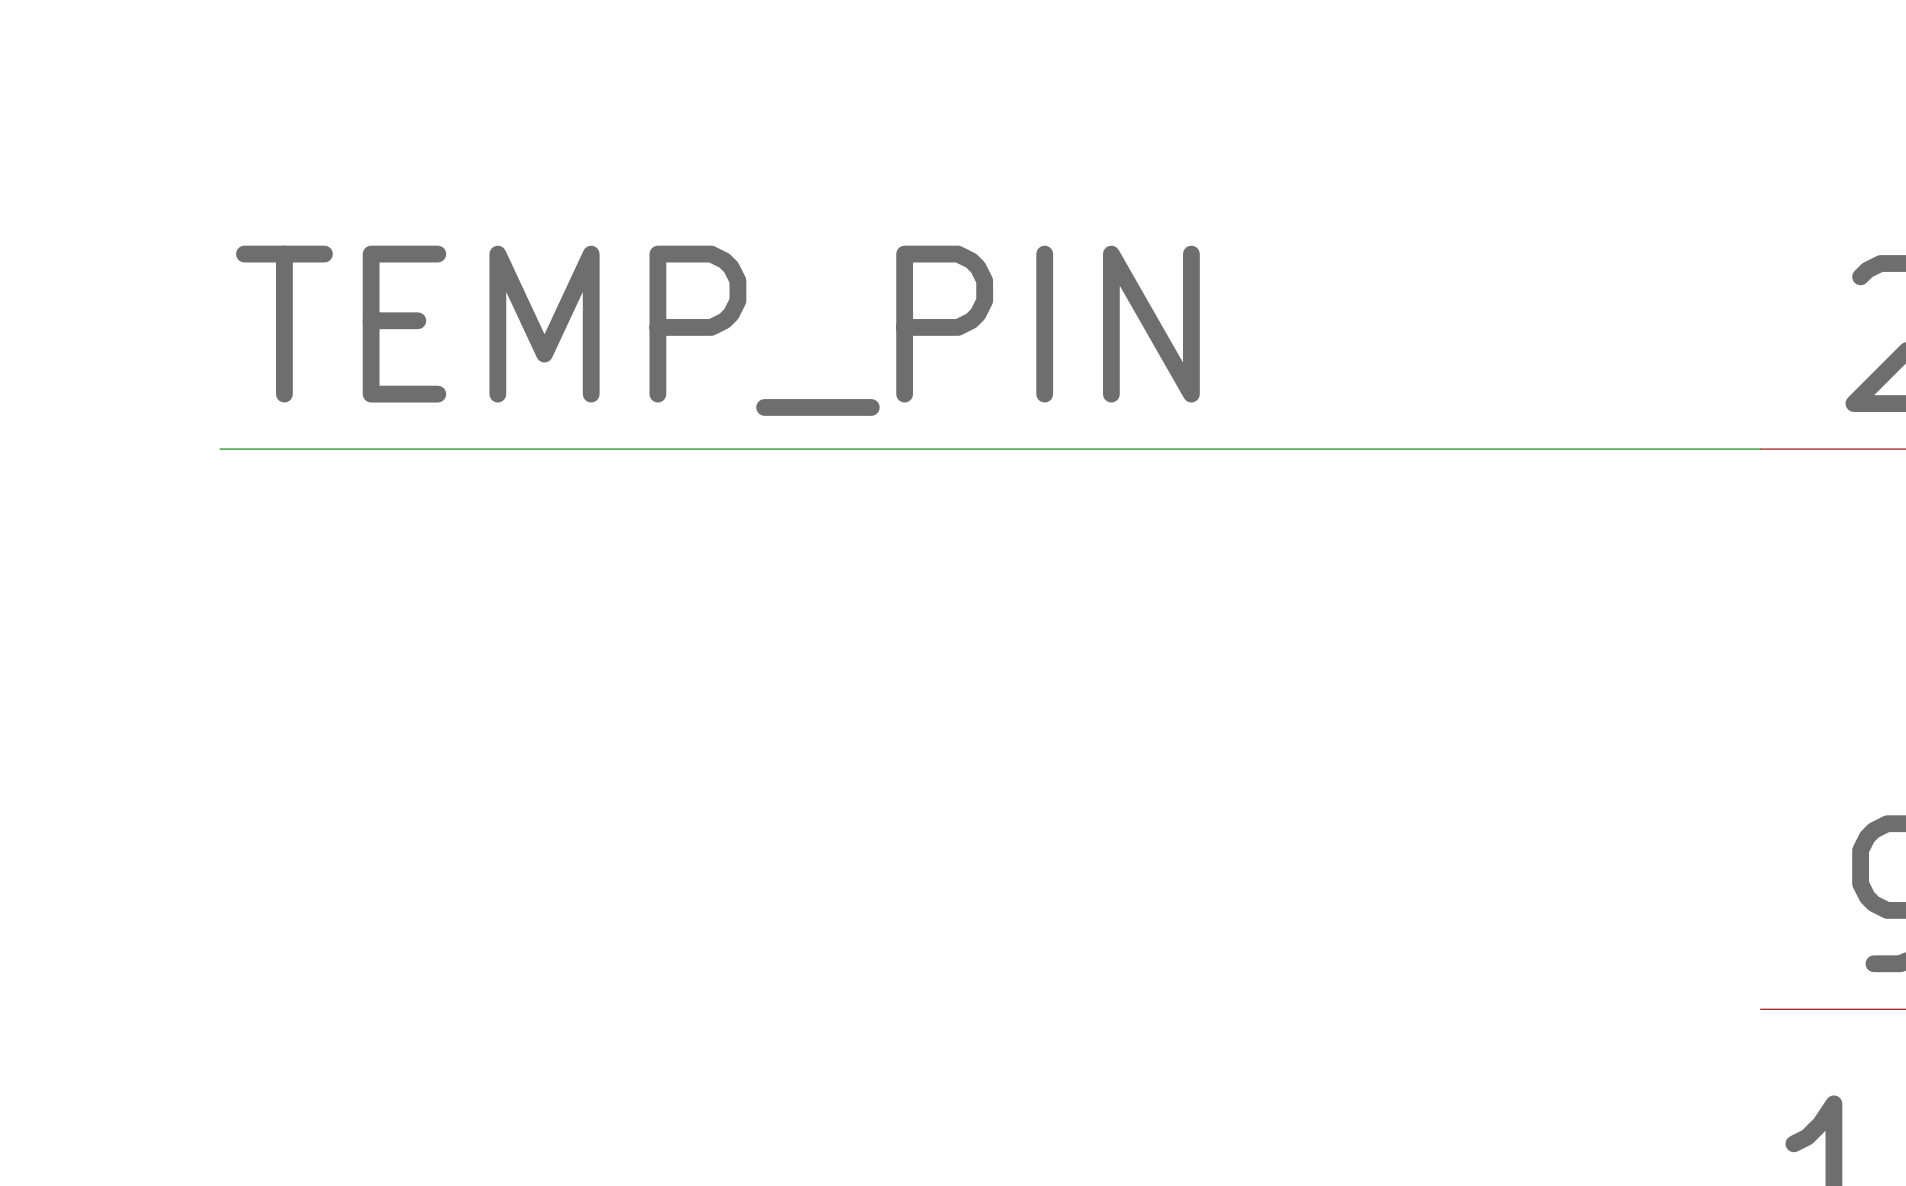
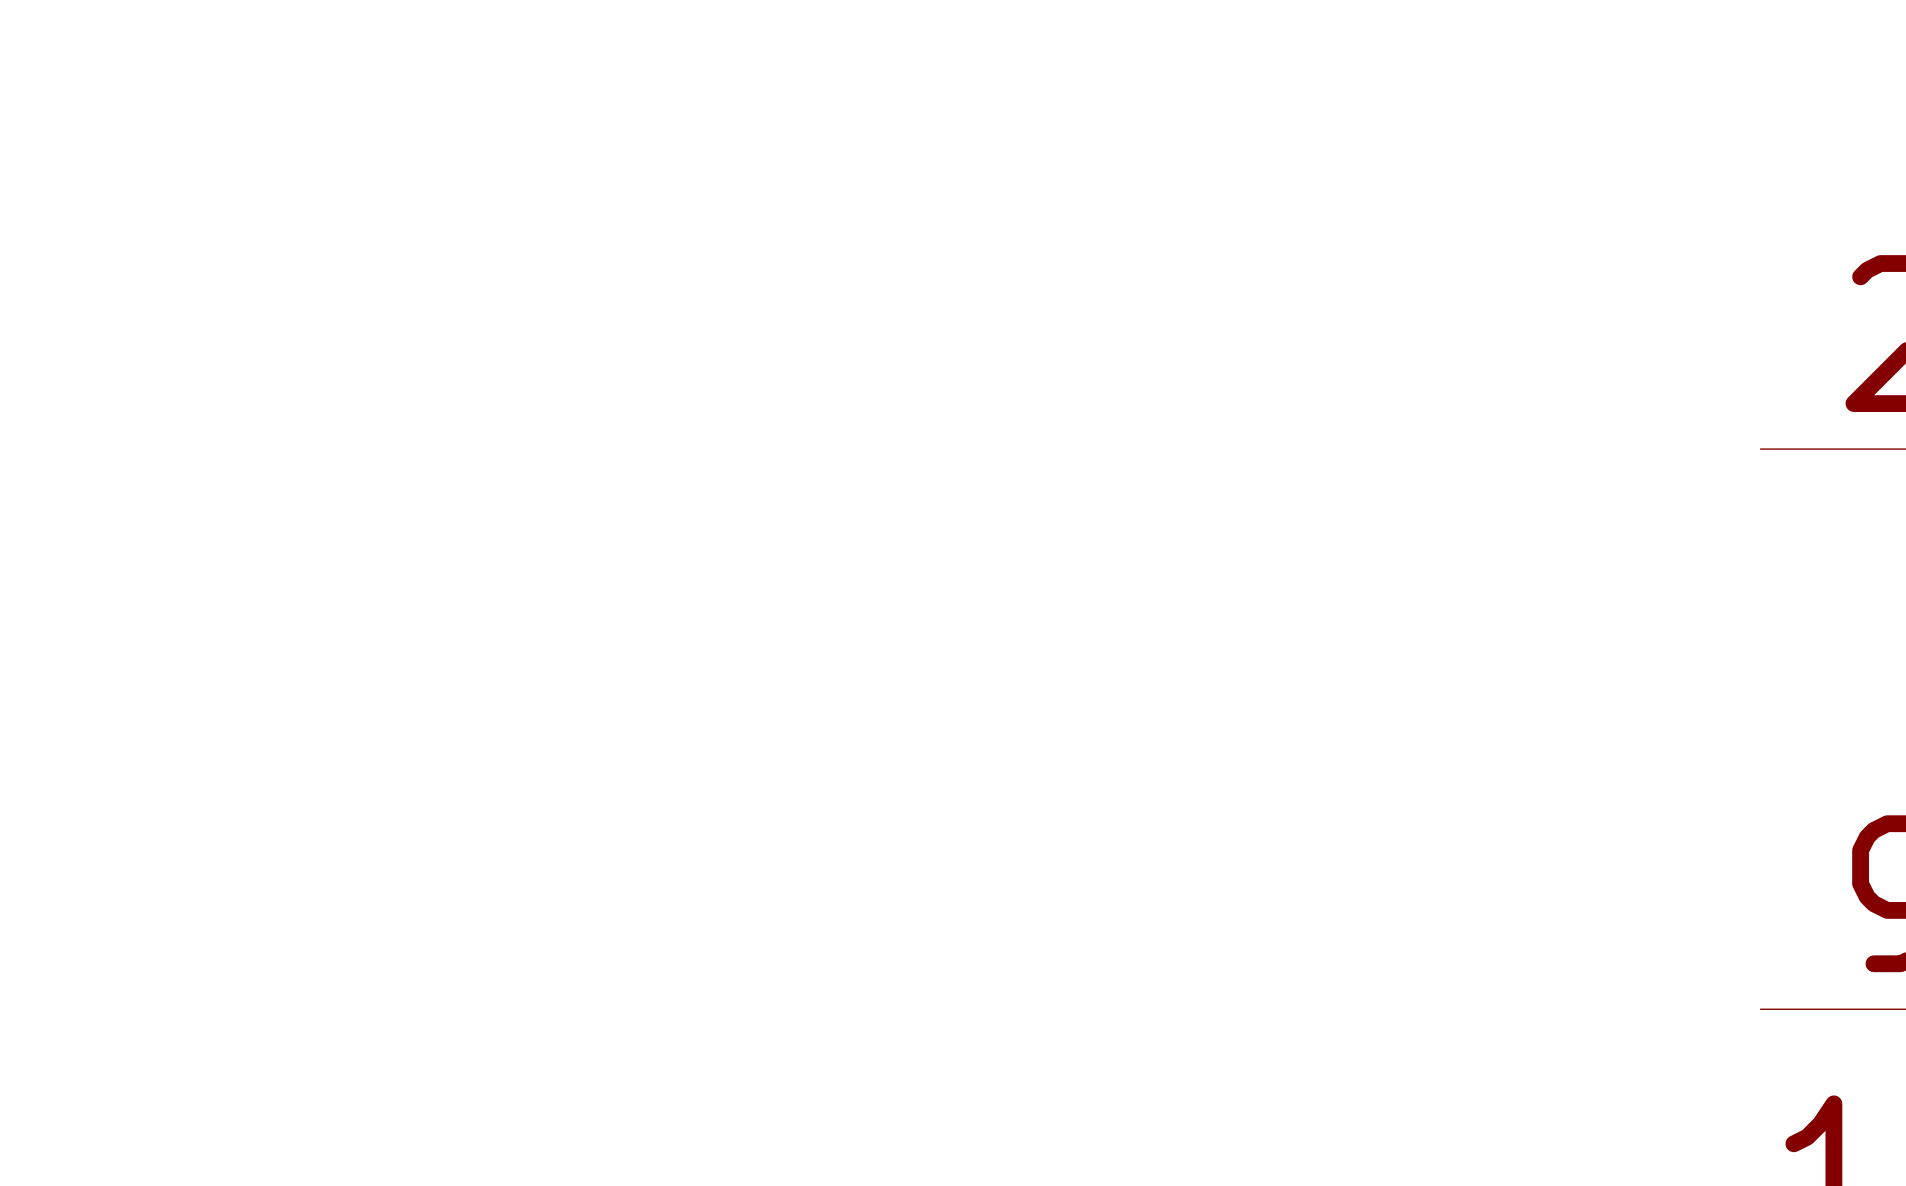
label: TEMP_PIN (717, 330) -> none
wire: (220, 449) (1760, 449) -> none

